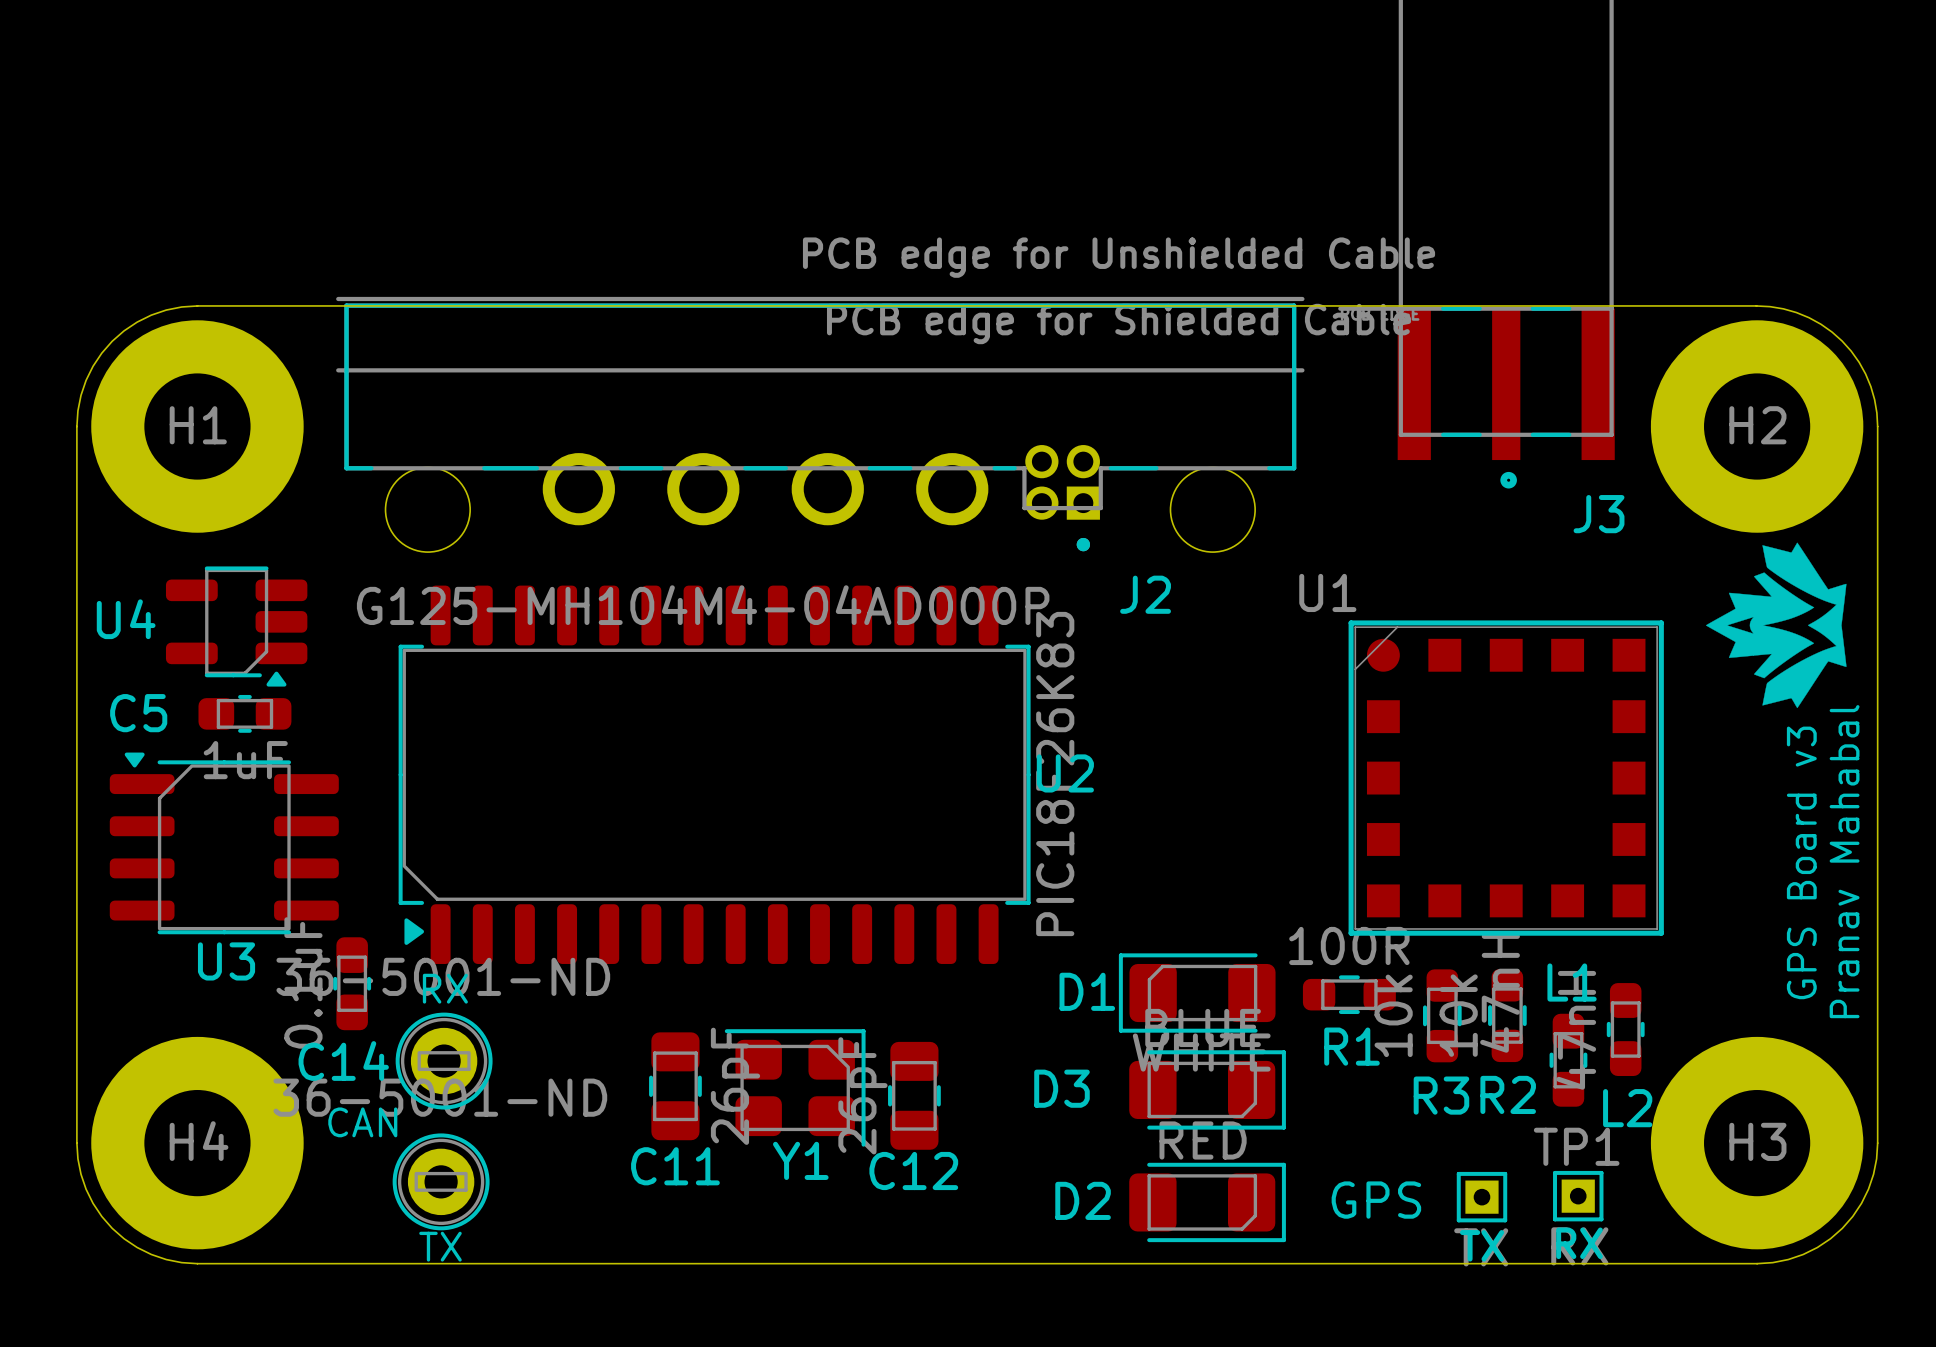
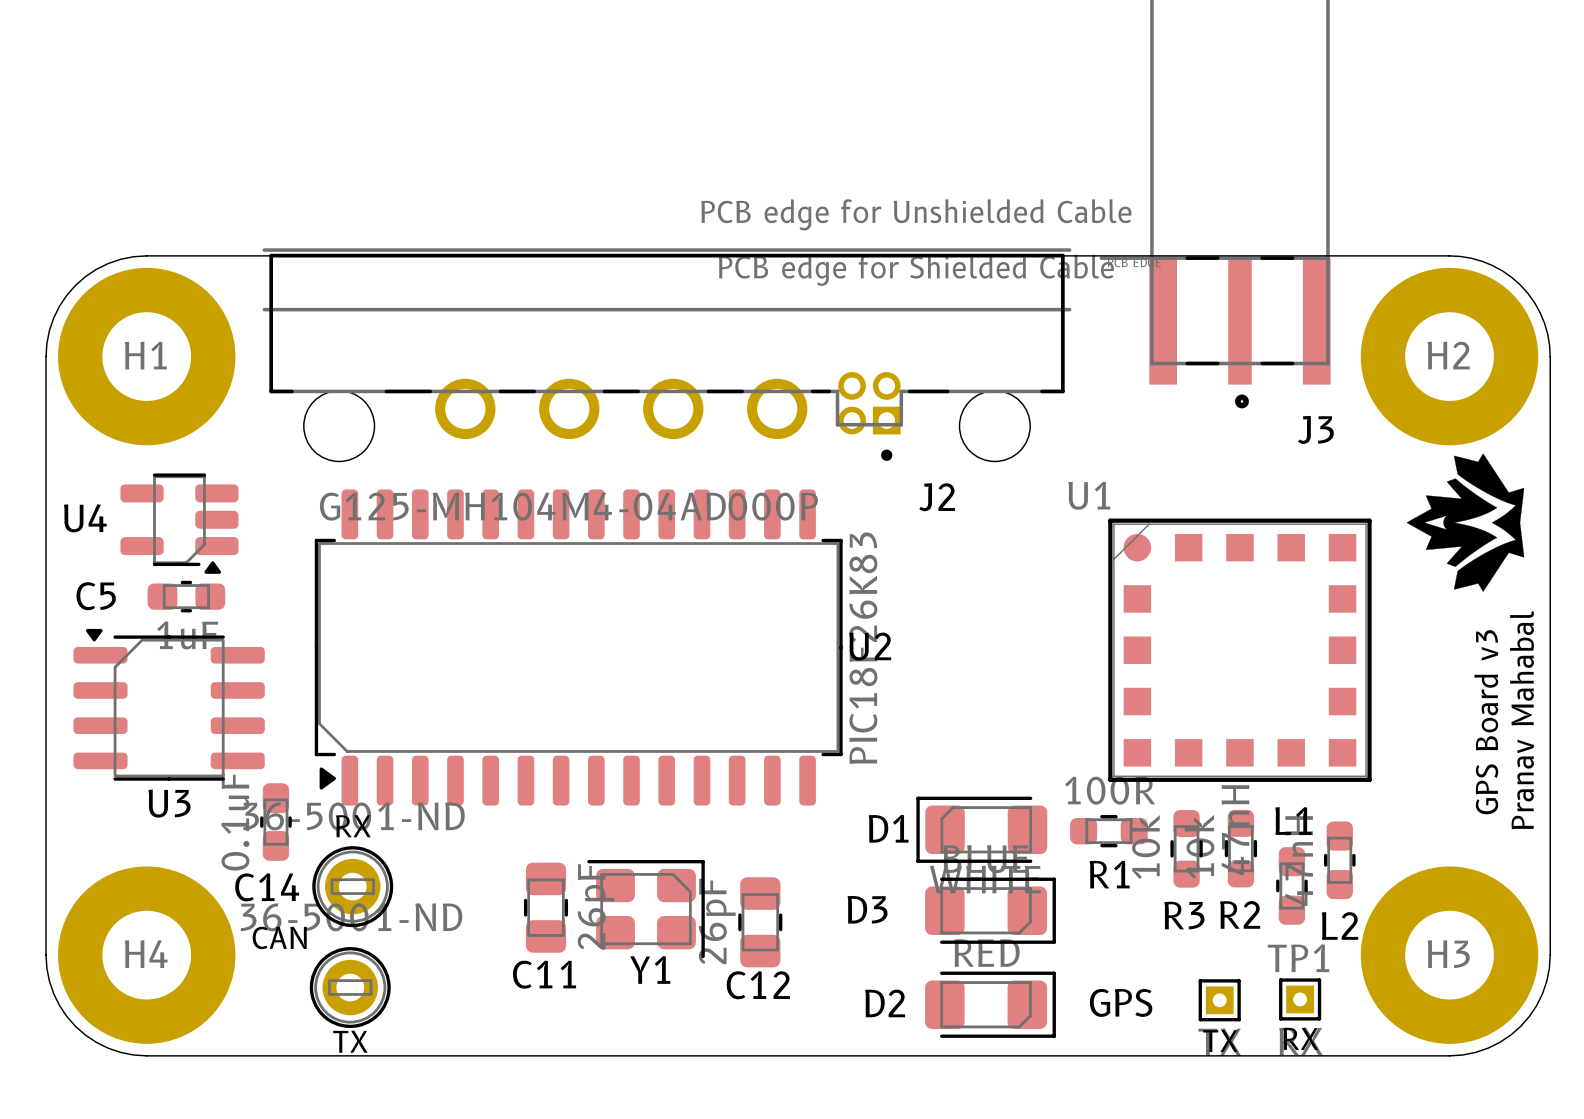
C12 position: (914, 1095) -> (760, 922)

